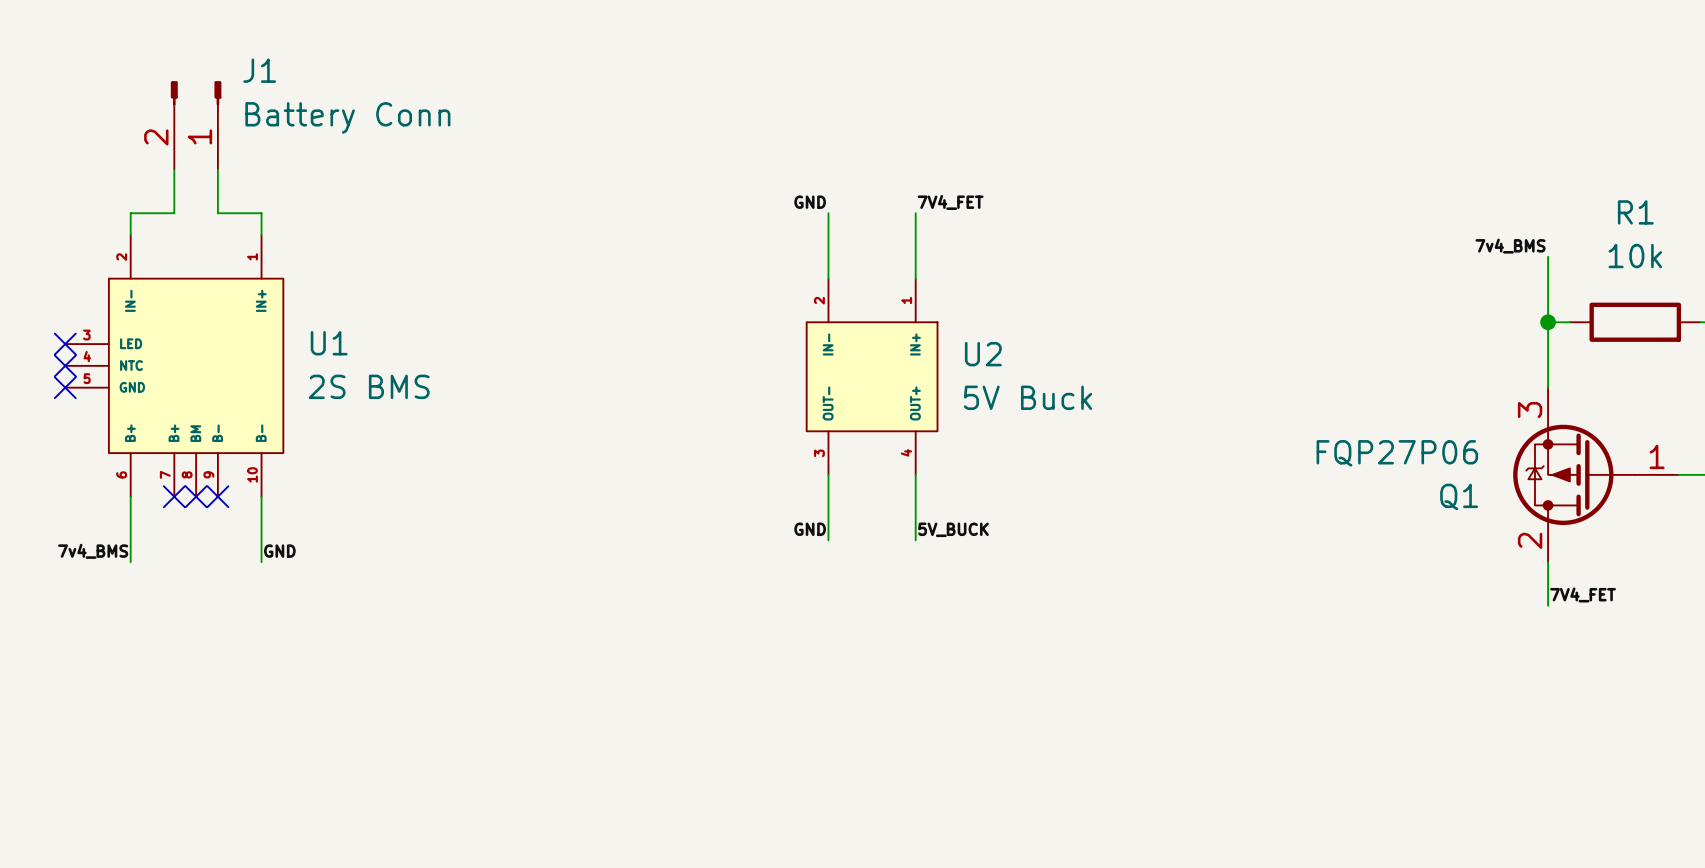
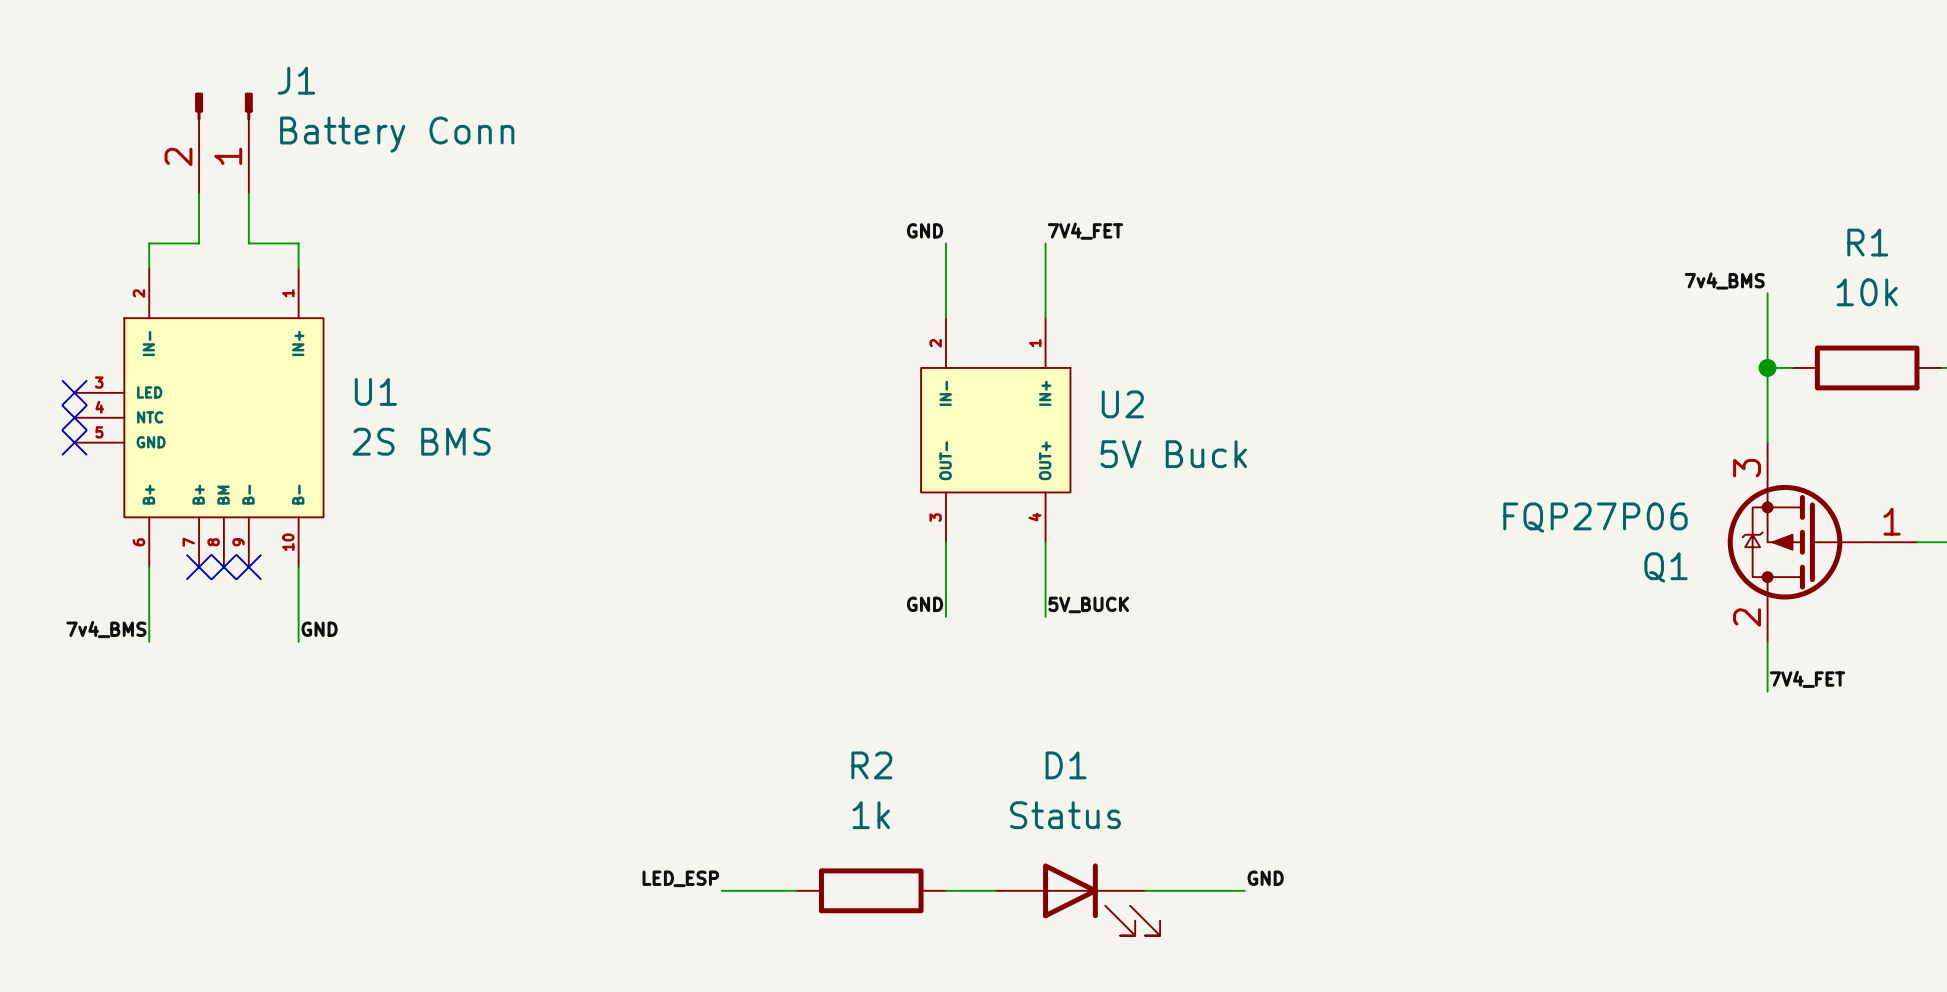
label: none -> LED_ESP (680, 878)
label: none -> GND (1265, 878)
wire: none -> (721, 890) (796, 890)
R2: none -> 1k (871, 890)
wire: none -> (945, 890) (995, 890)
wire: none -> (1145, 890) (1244, 890)
D1: none -> Status (1077, 899)

